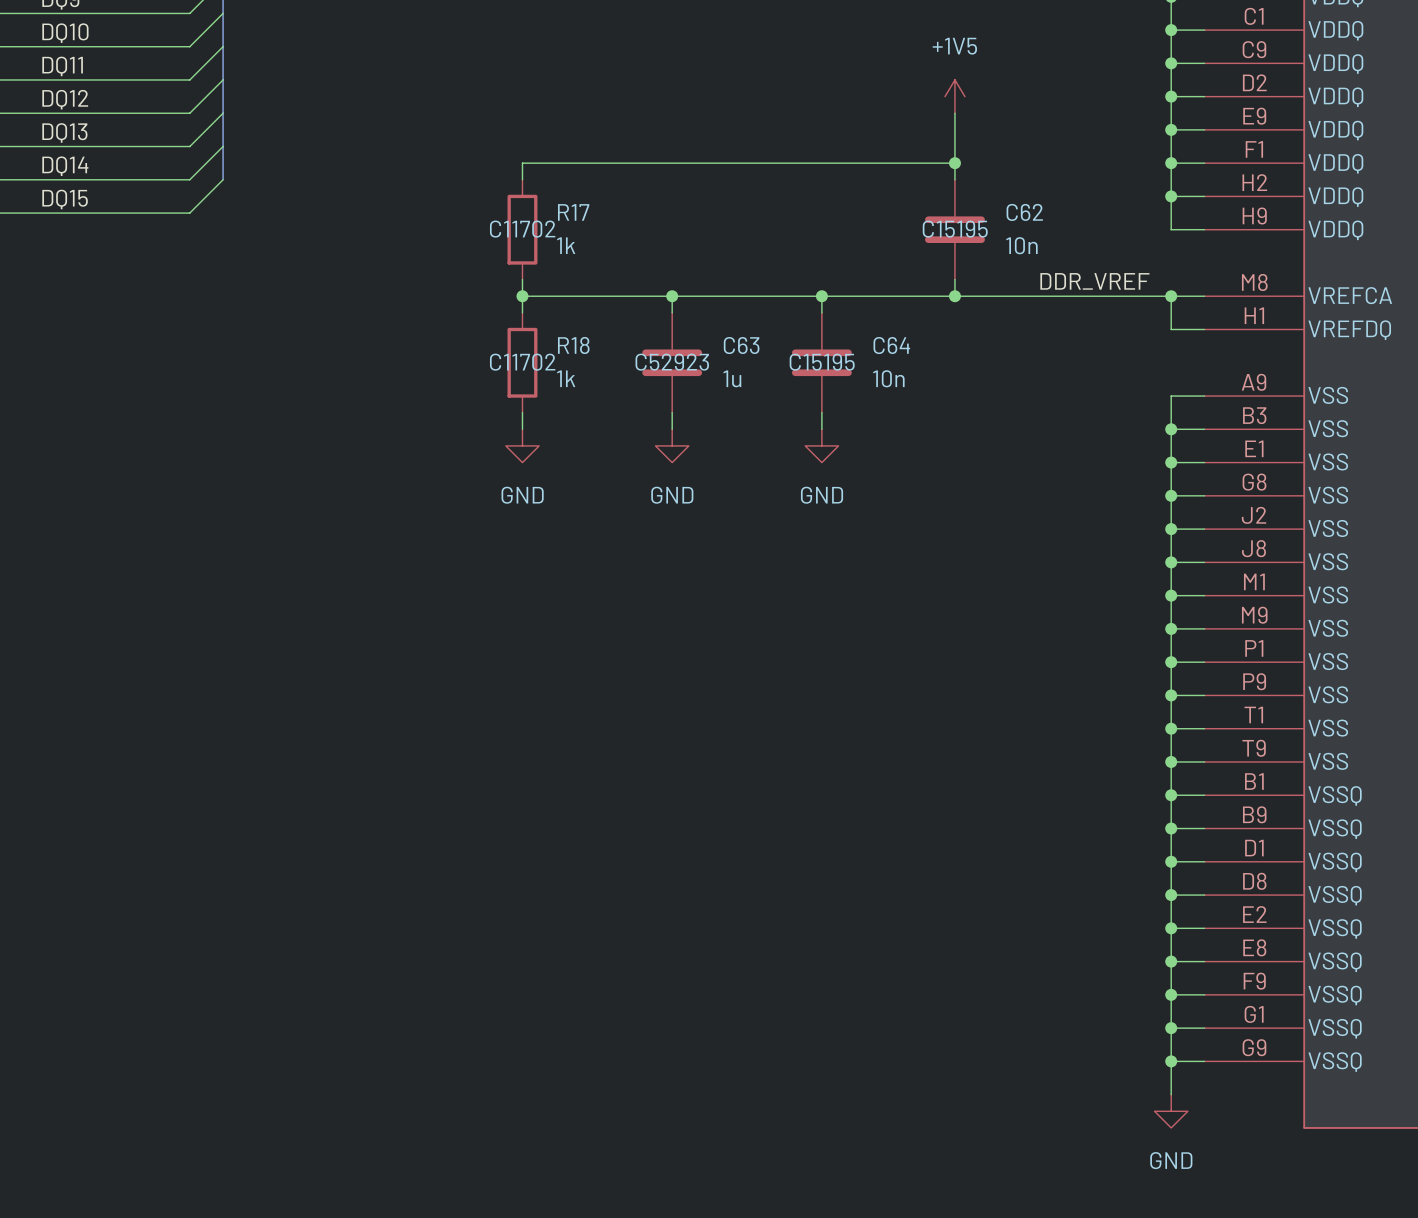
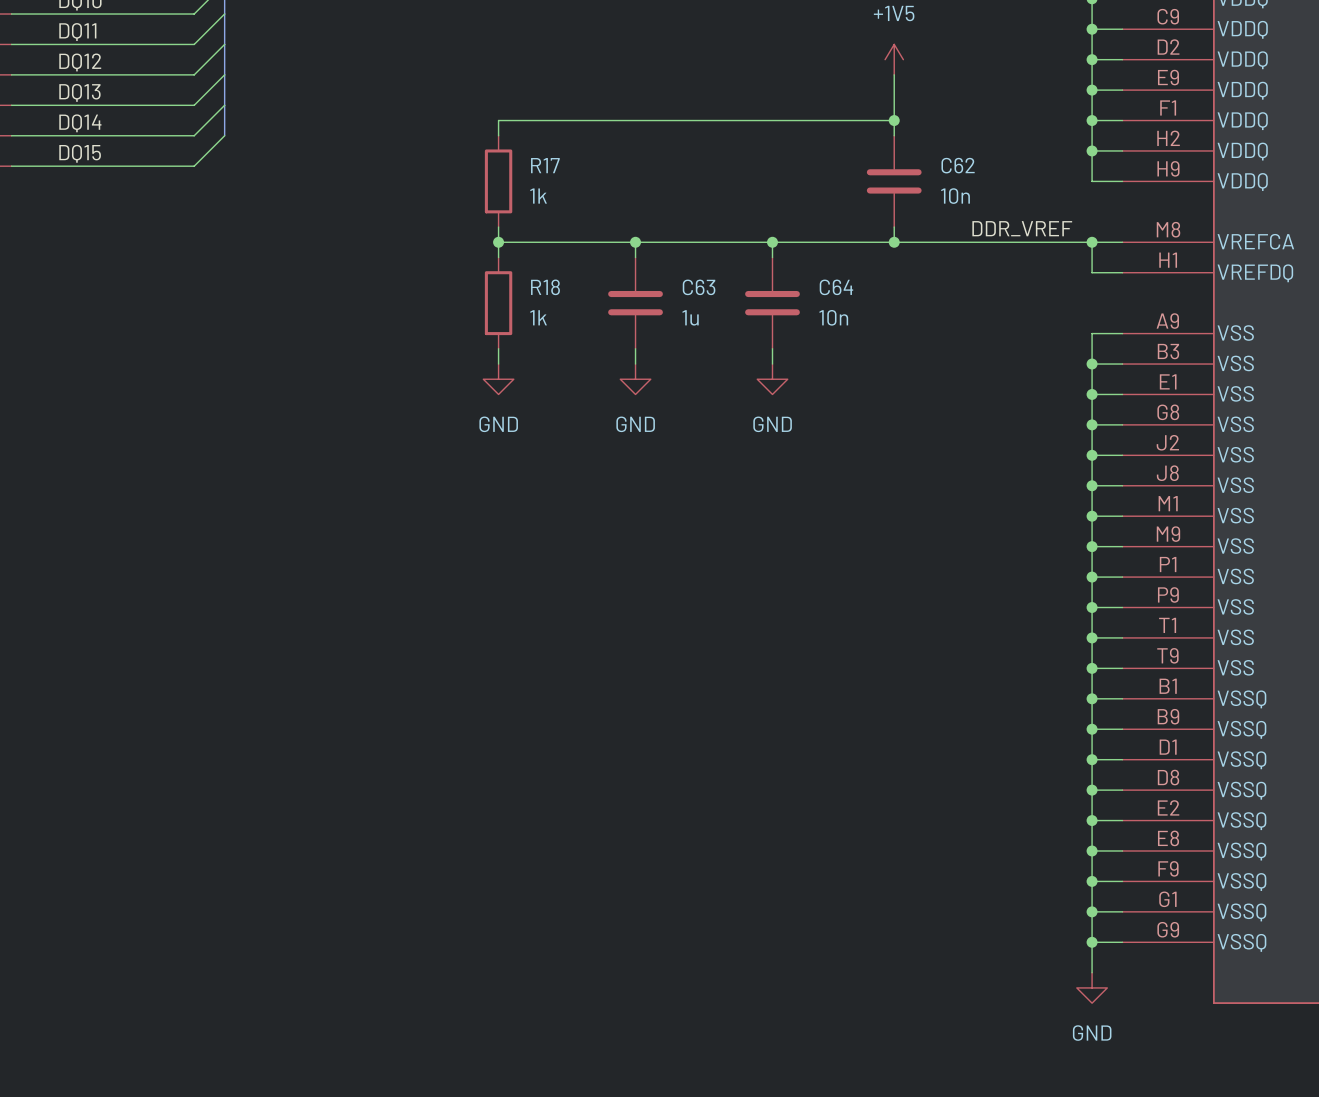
R17 text: C11702 (522, 229) -> none
C62 text: C15195 (955, 229) -> none
R18 text: C11702 (522, 362) -> none
C63 text: C52923 (672, 362) -> none
C64 text: C15195 (822, 362) -> none

